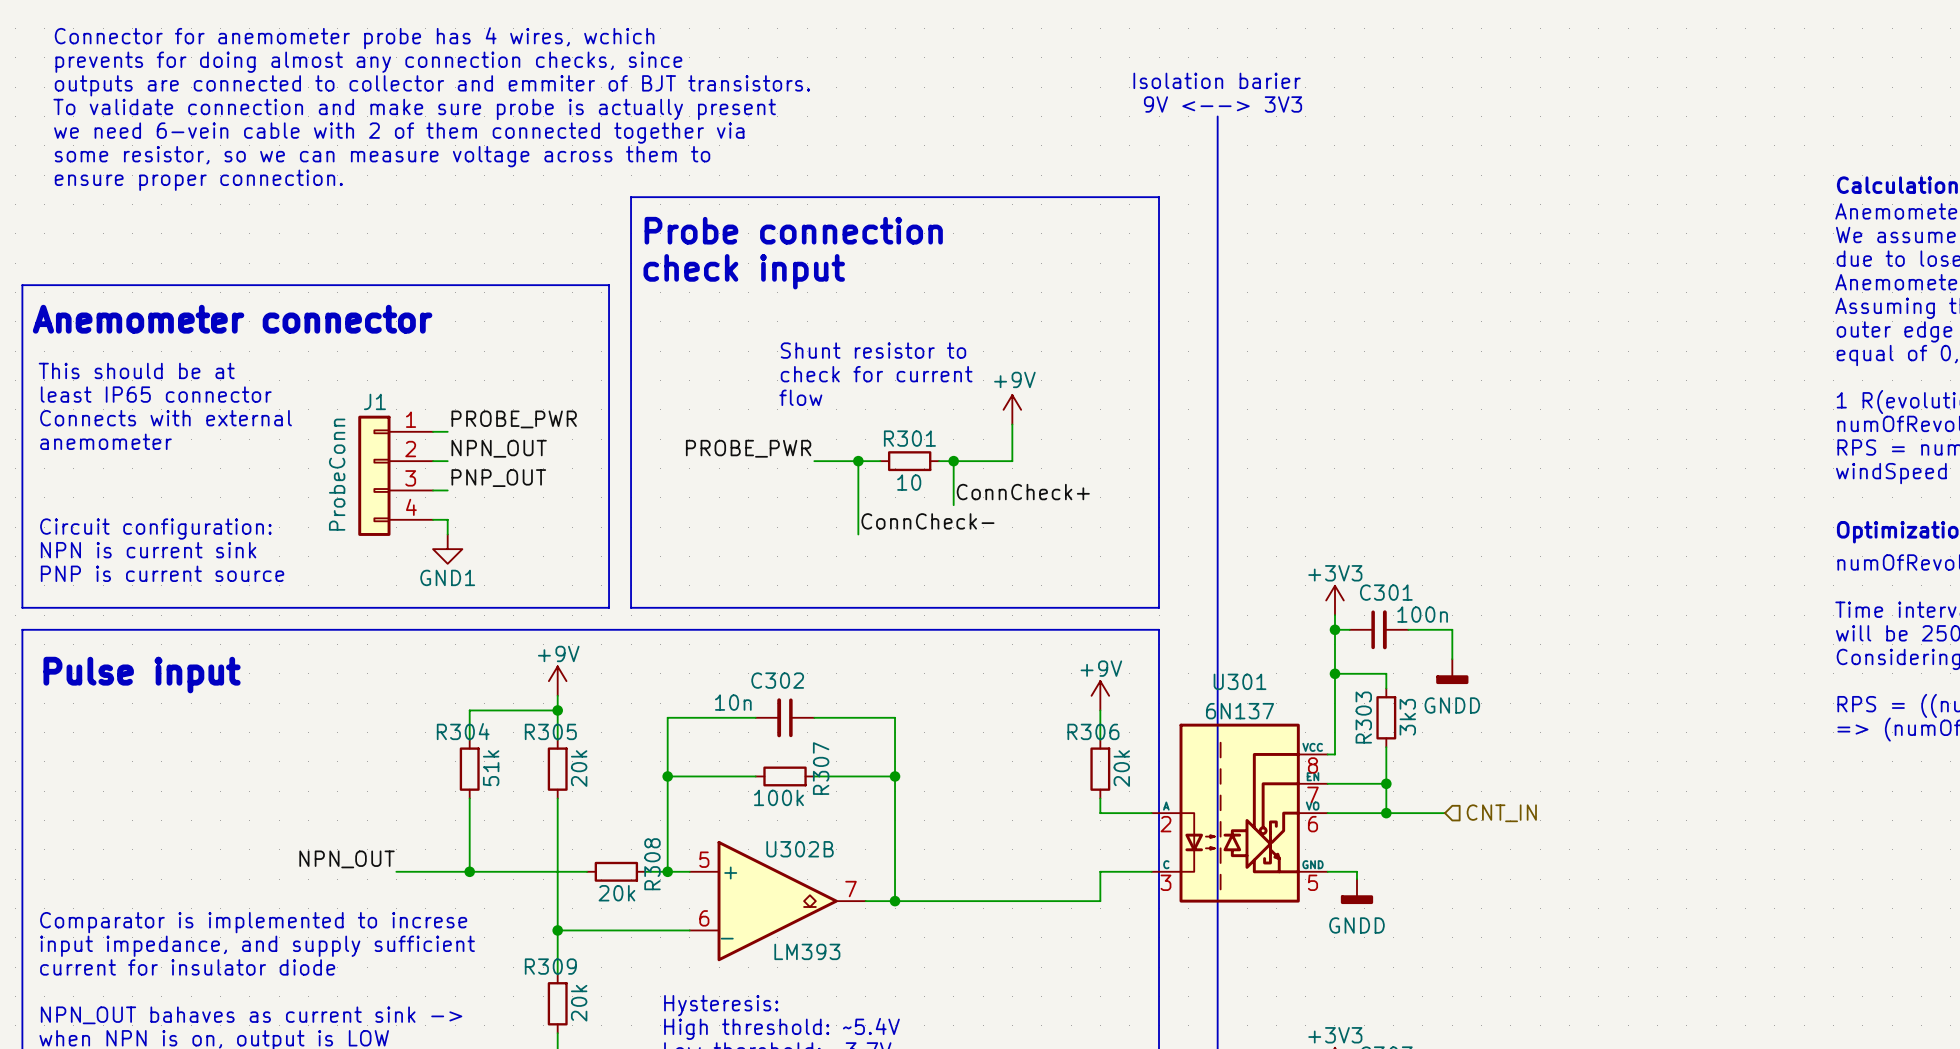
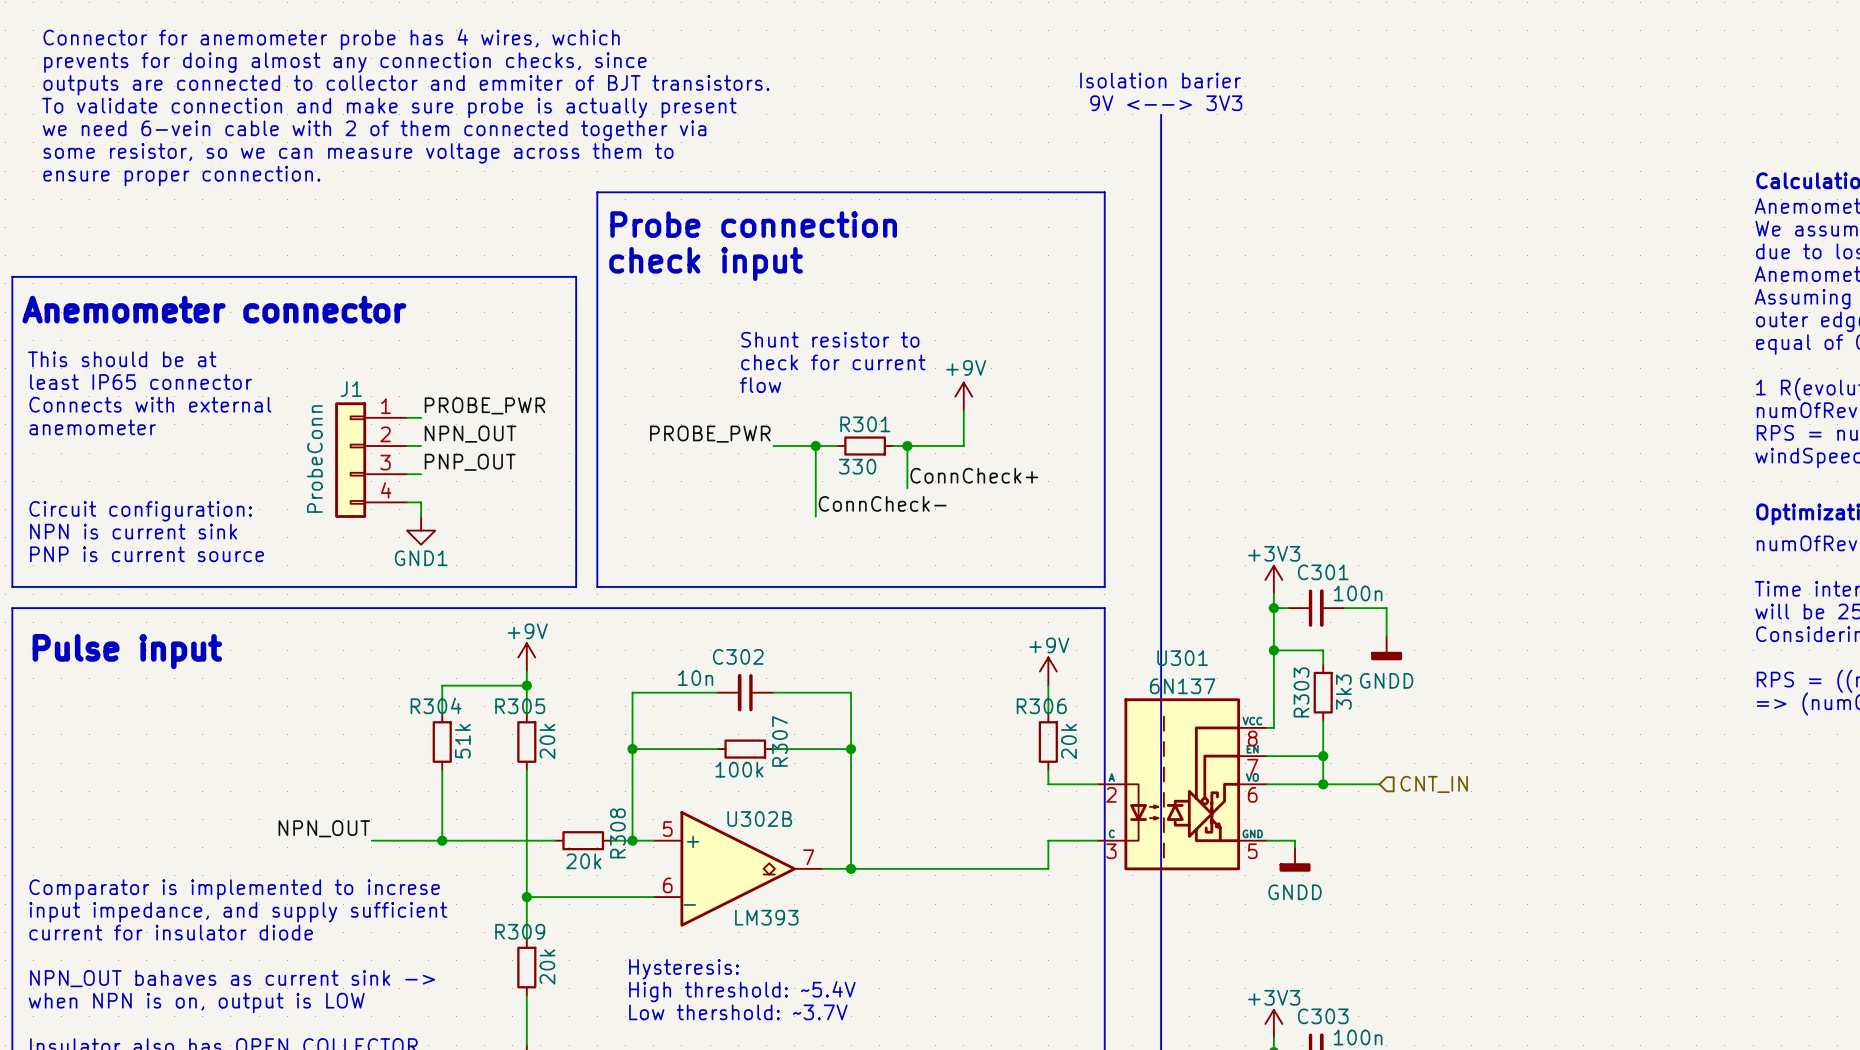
R301 value: 10 (909, 482) -> 330 (857, 466)

